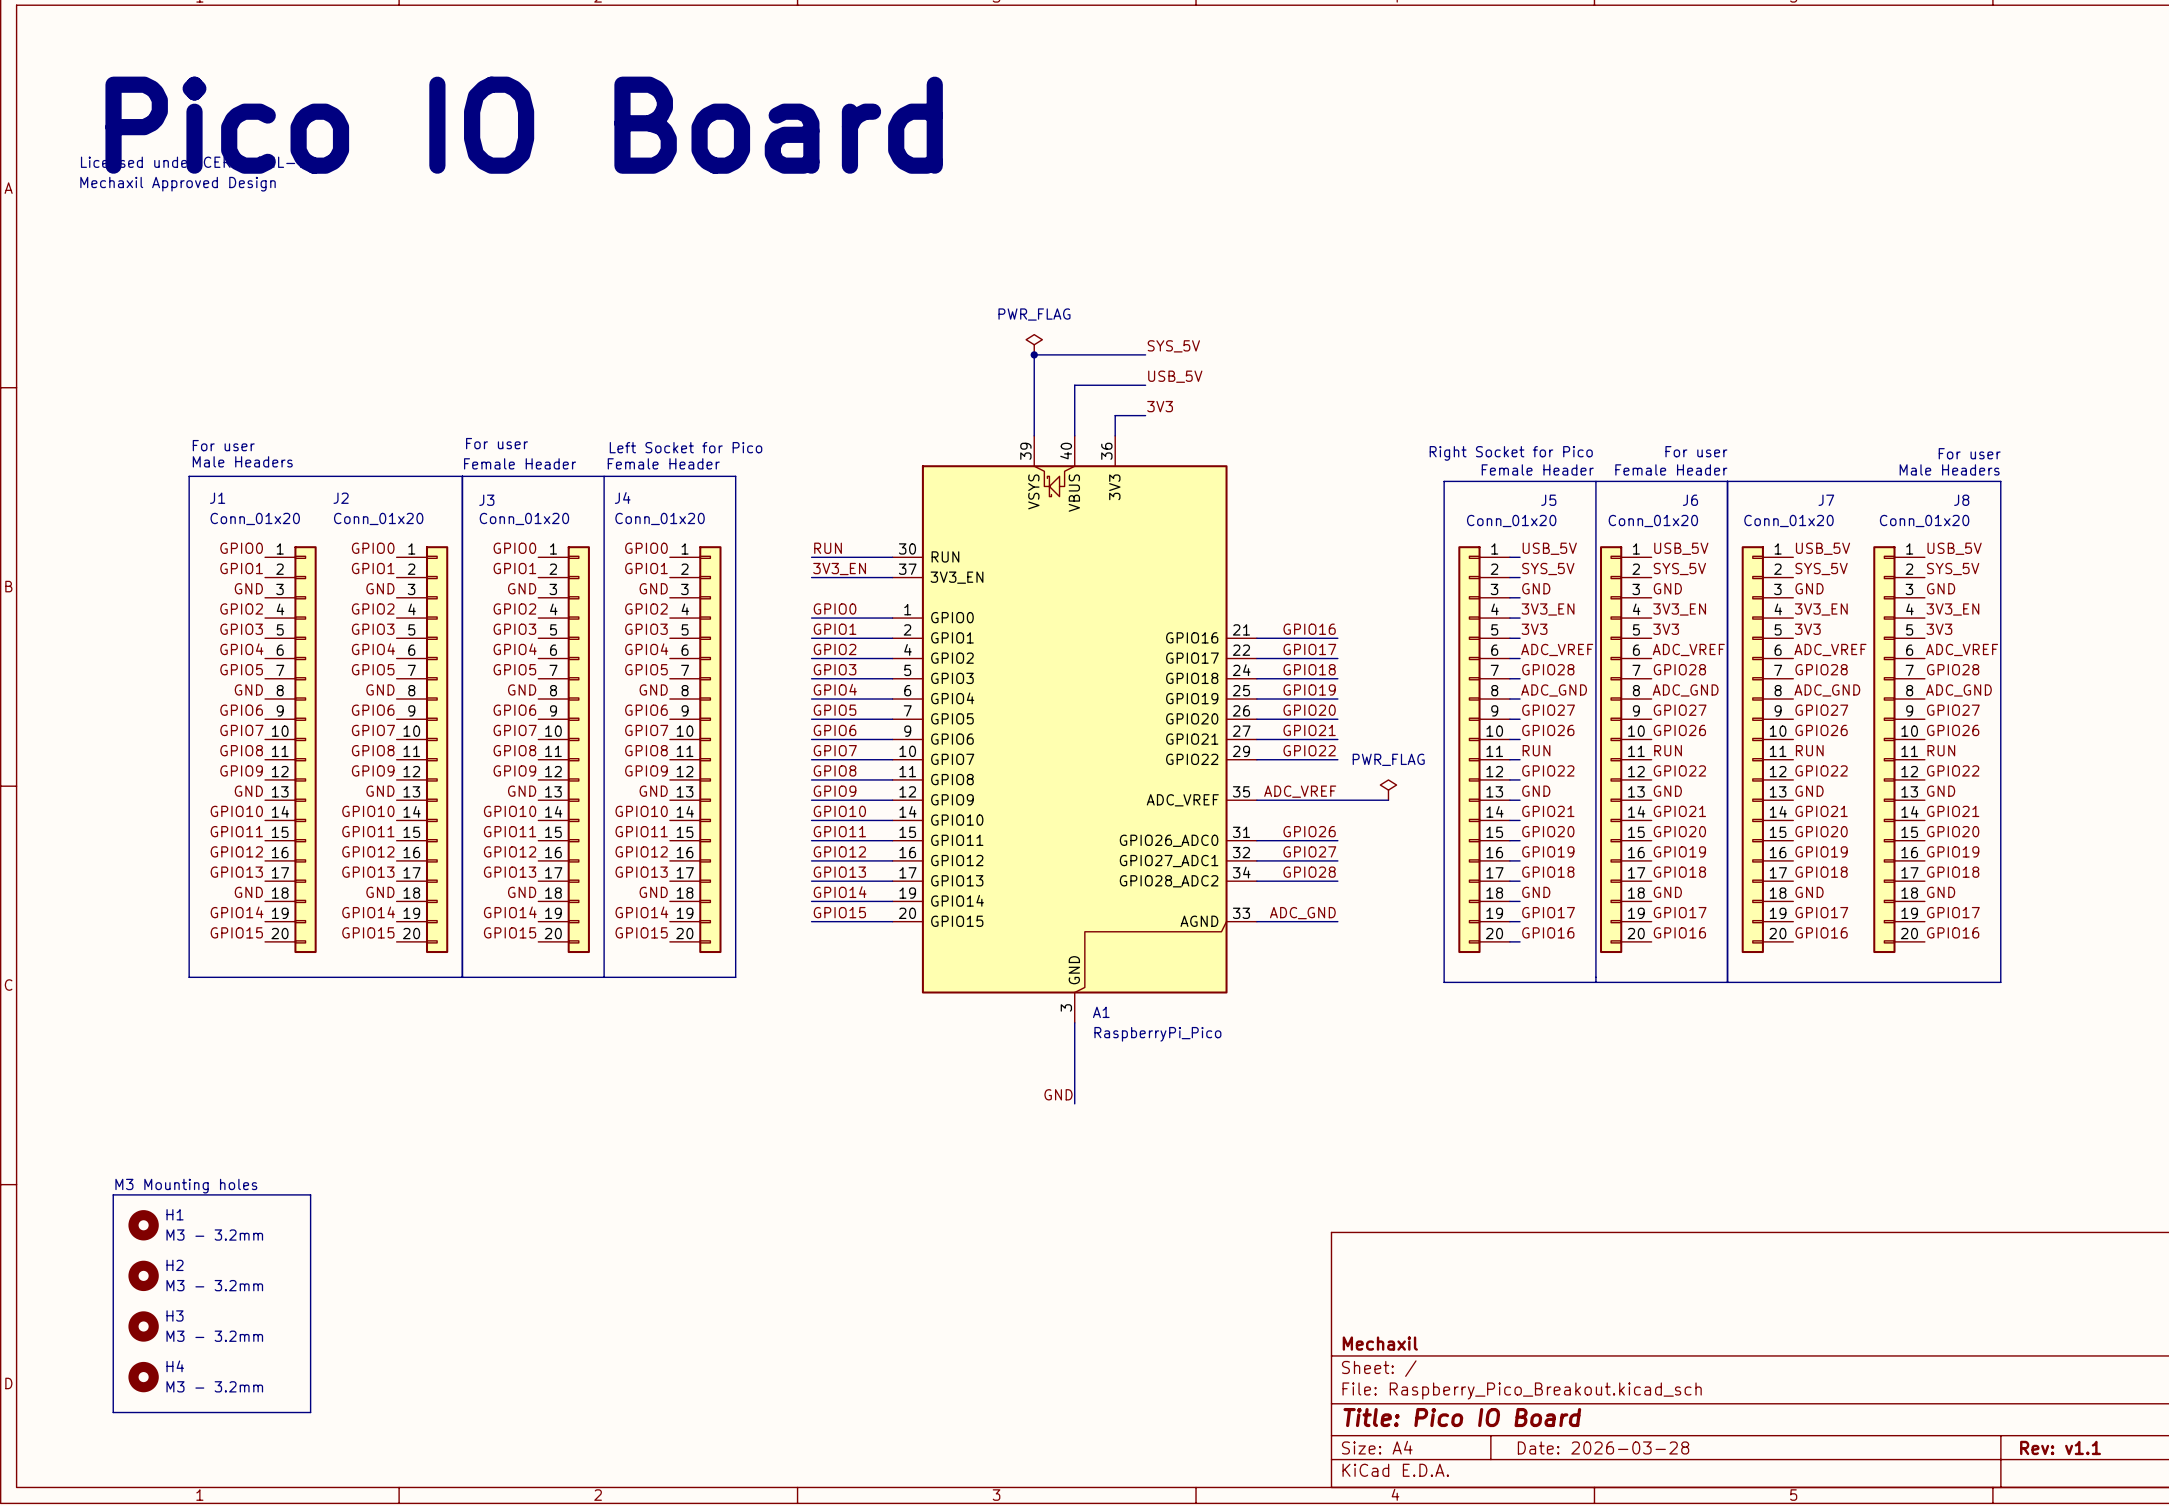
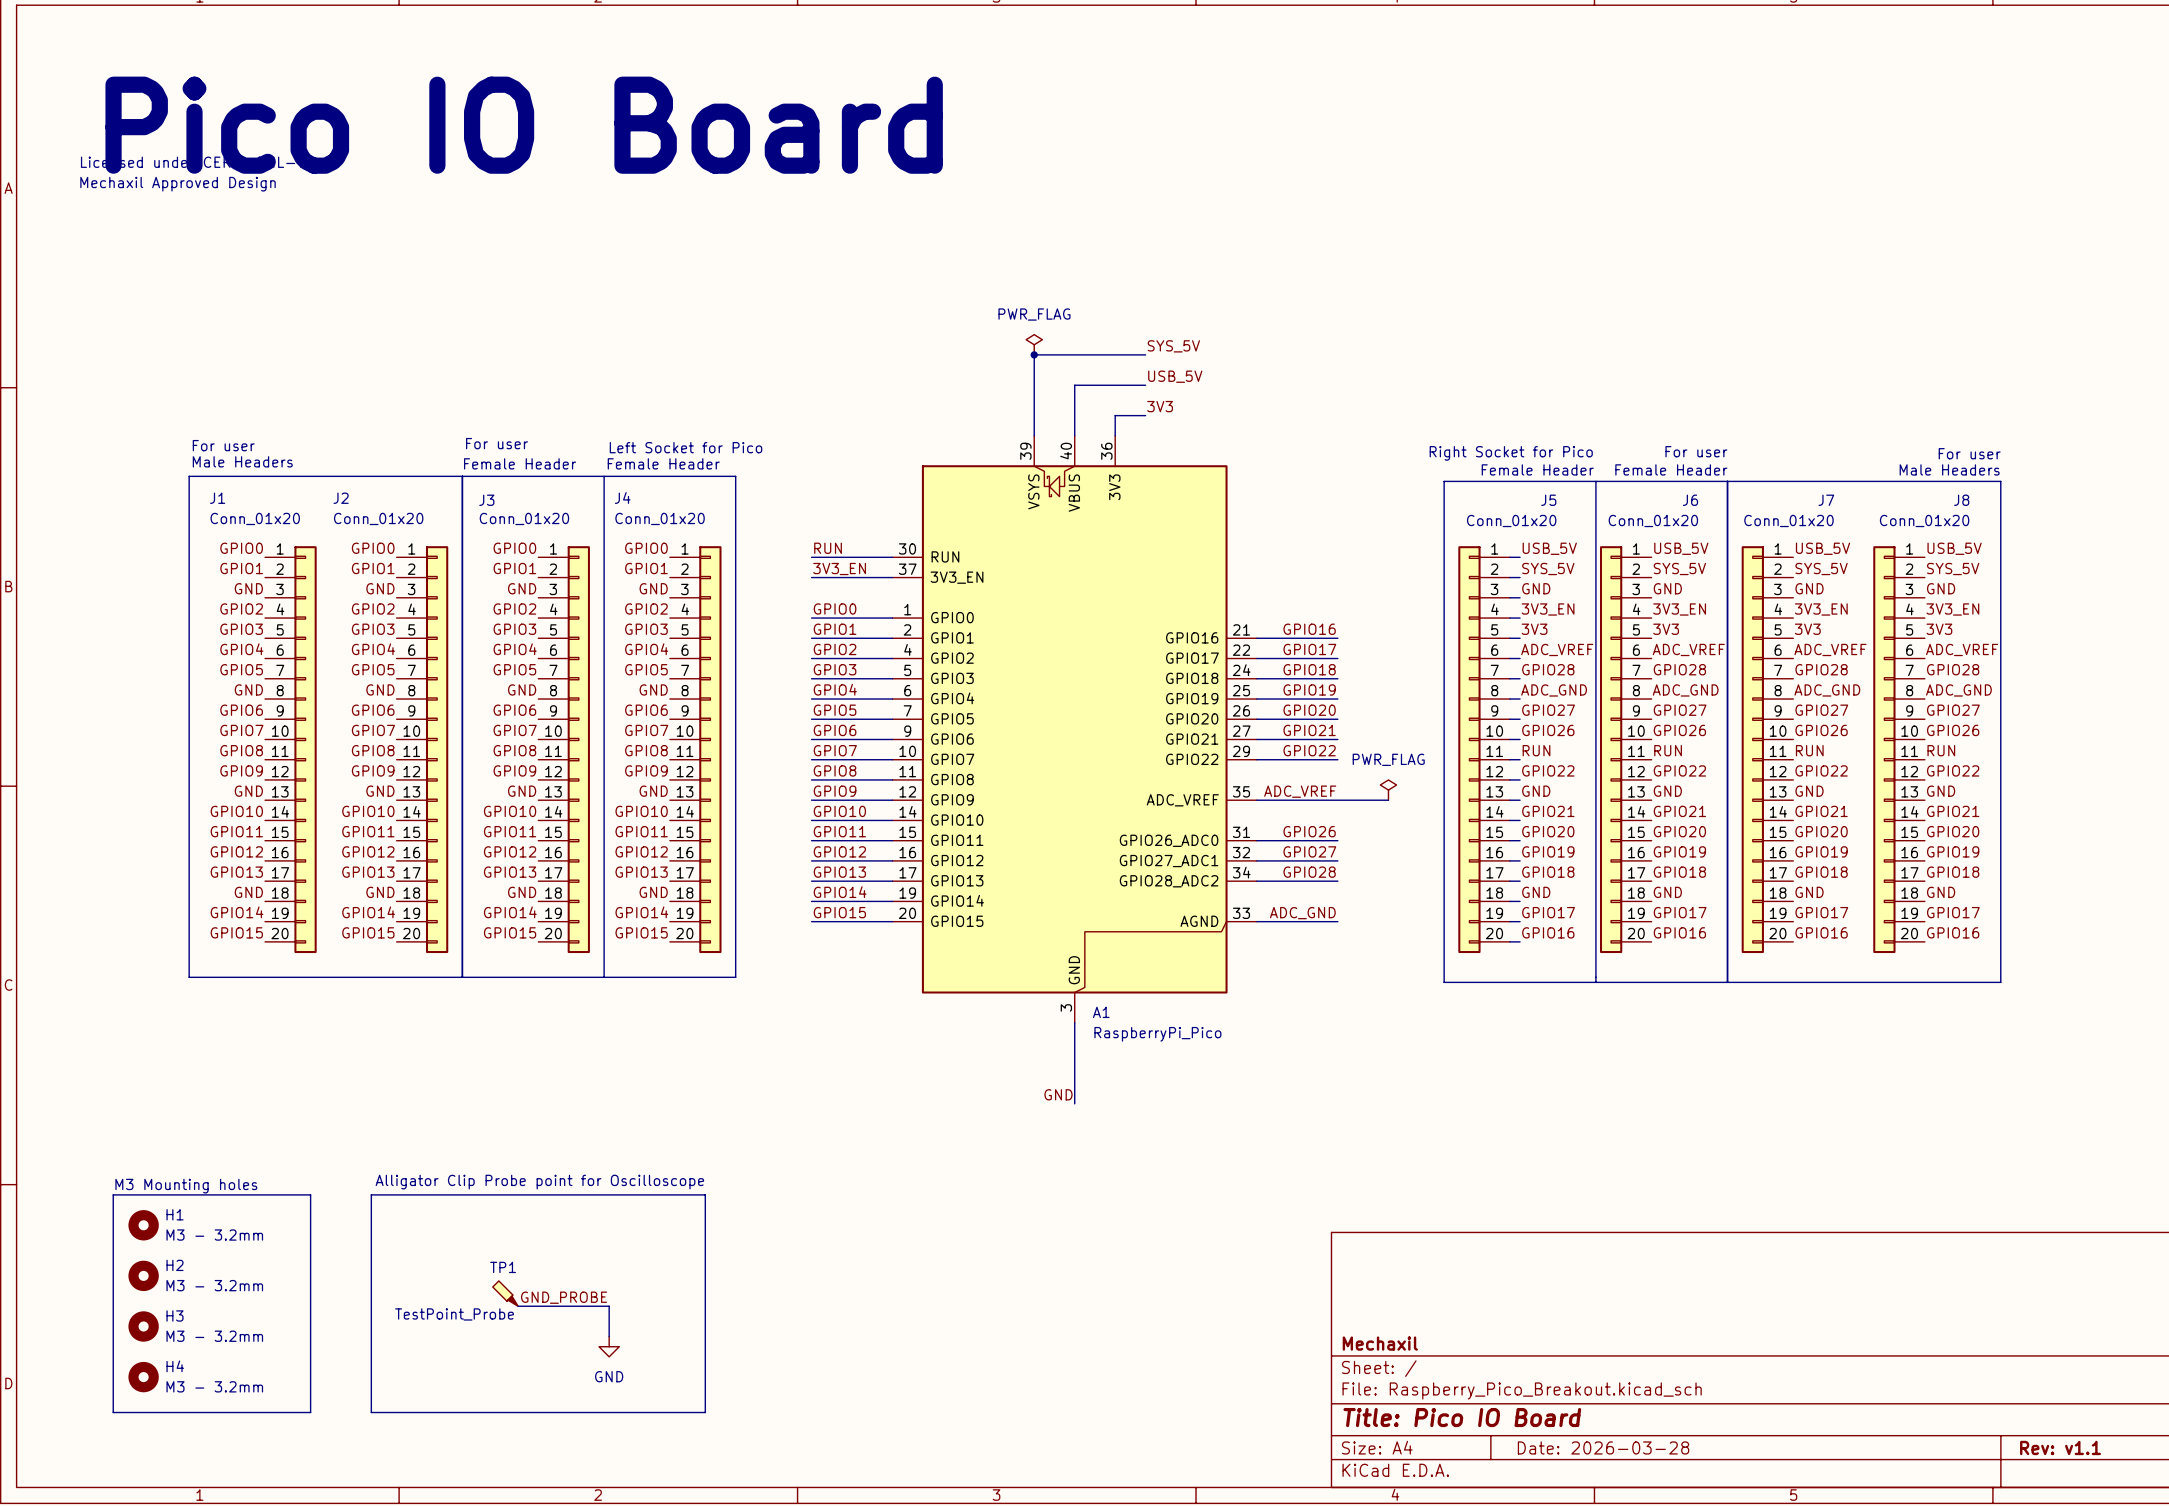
text: none -> Alligator Clip Probe point for Oscilloscope (539, 1182)
line: none -> (371, 1194) (705, 1194) (705, 1412) (371, 1412) (371, 1194)
TP1: none -> TestPoint_Probe (505, 1293)
label: none -> GND_PROBE (564, 1297)
wire: none -> (518, 1306) (609, 1306) (609, 1336)
power symbol: none -> GND (609, 1346)

